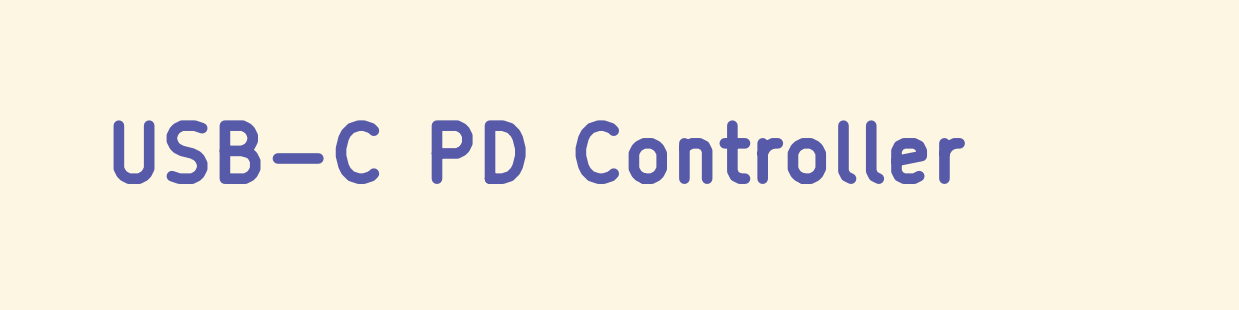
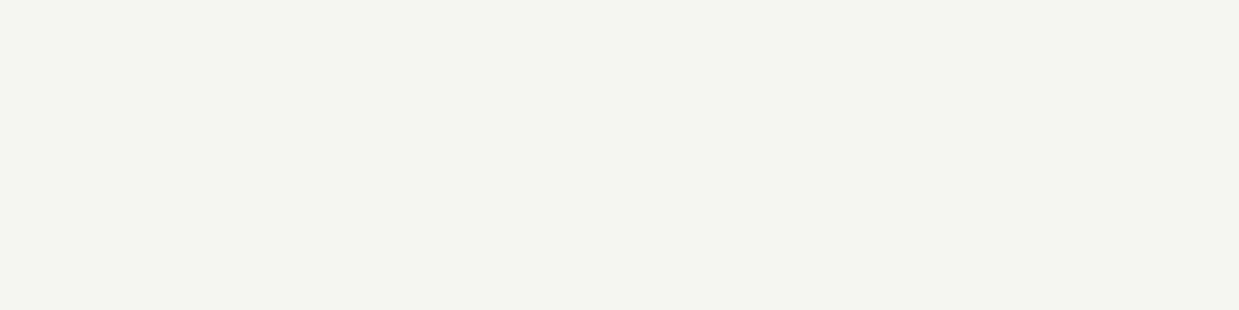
text: USB-C PD Controller (539, 152) -> none

